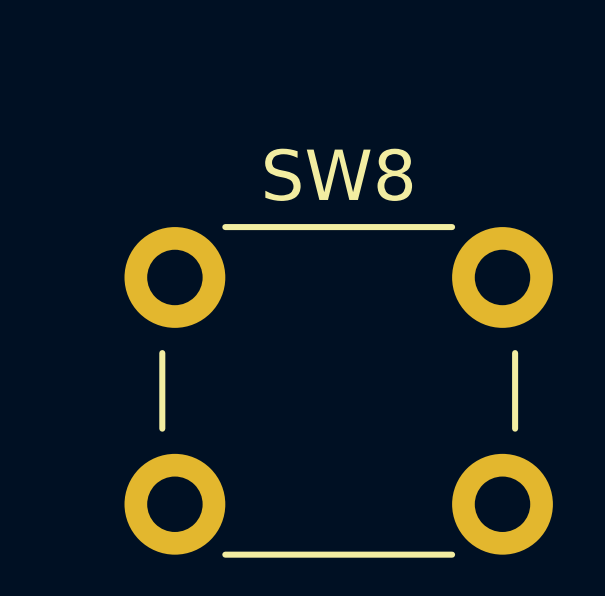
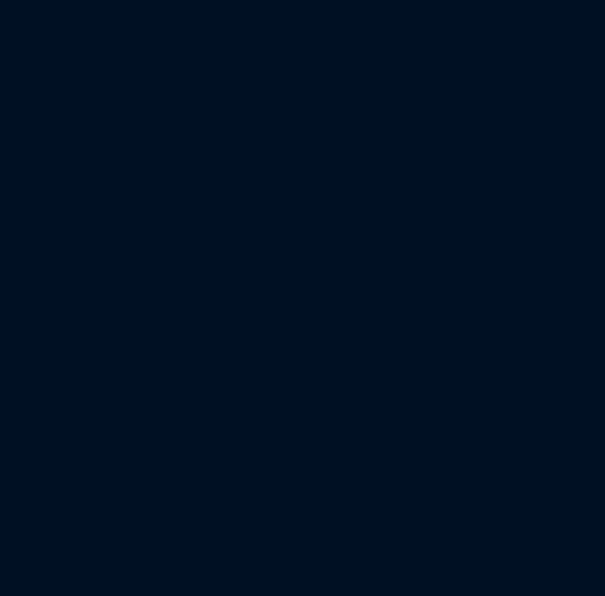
SW8: (338, 390) -> none

